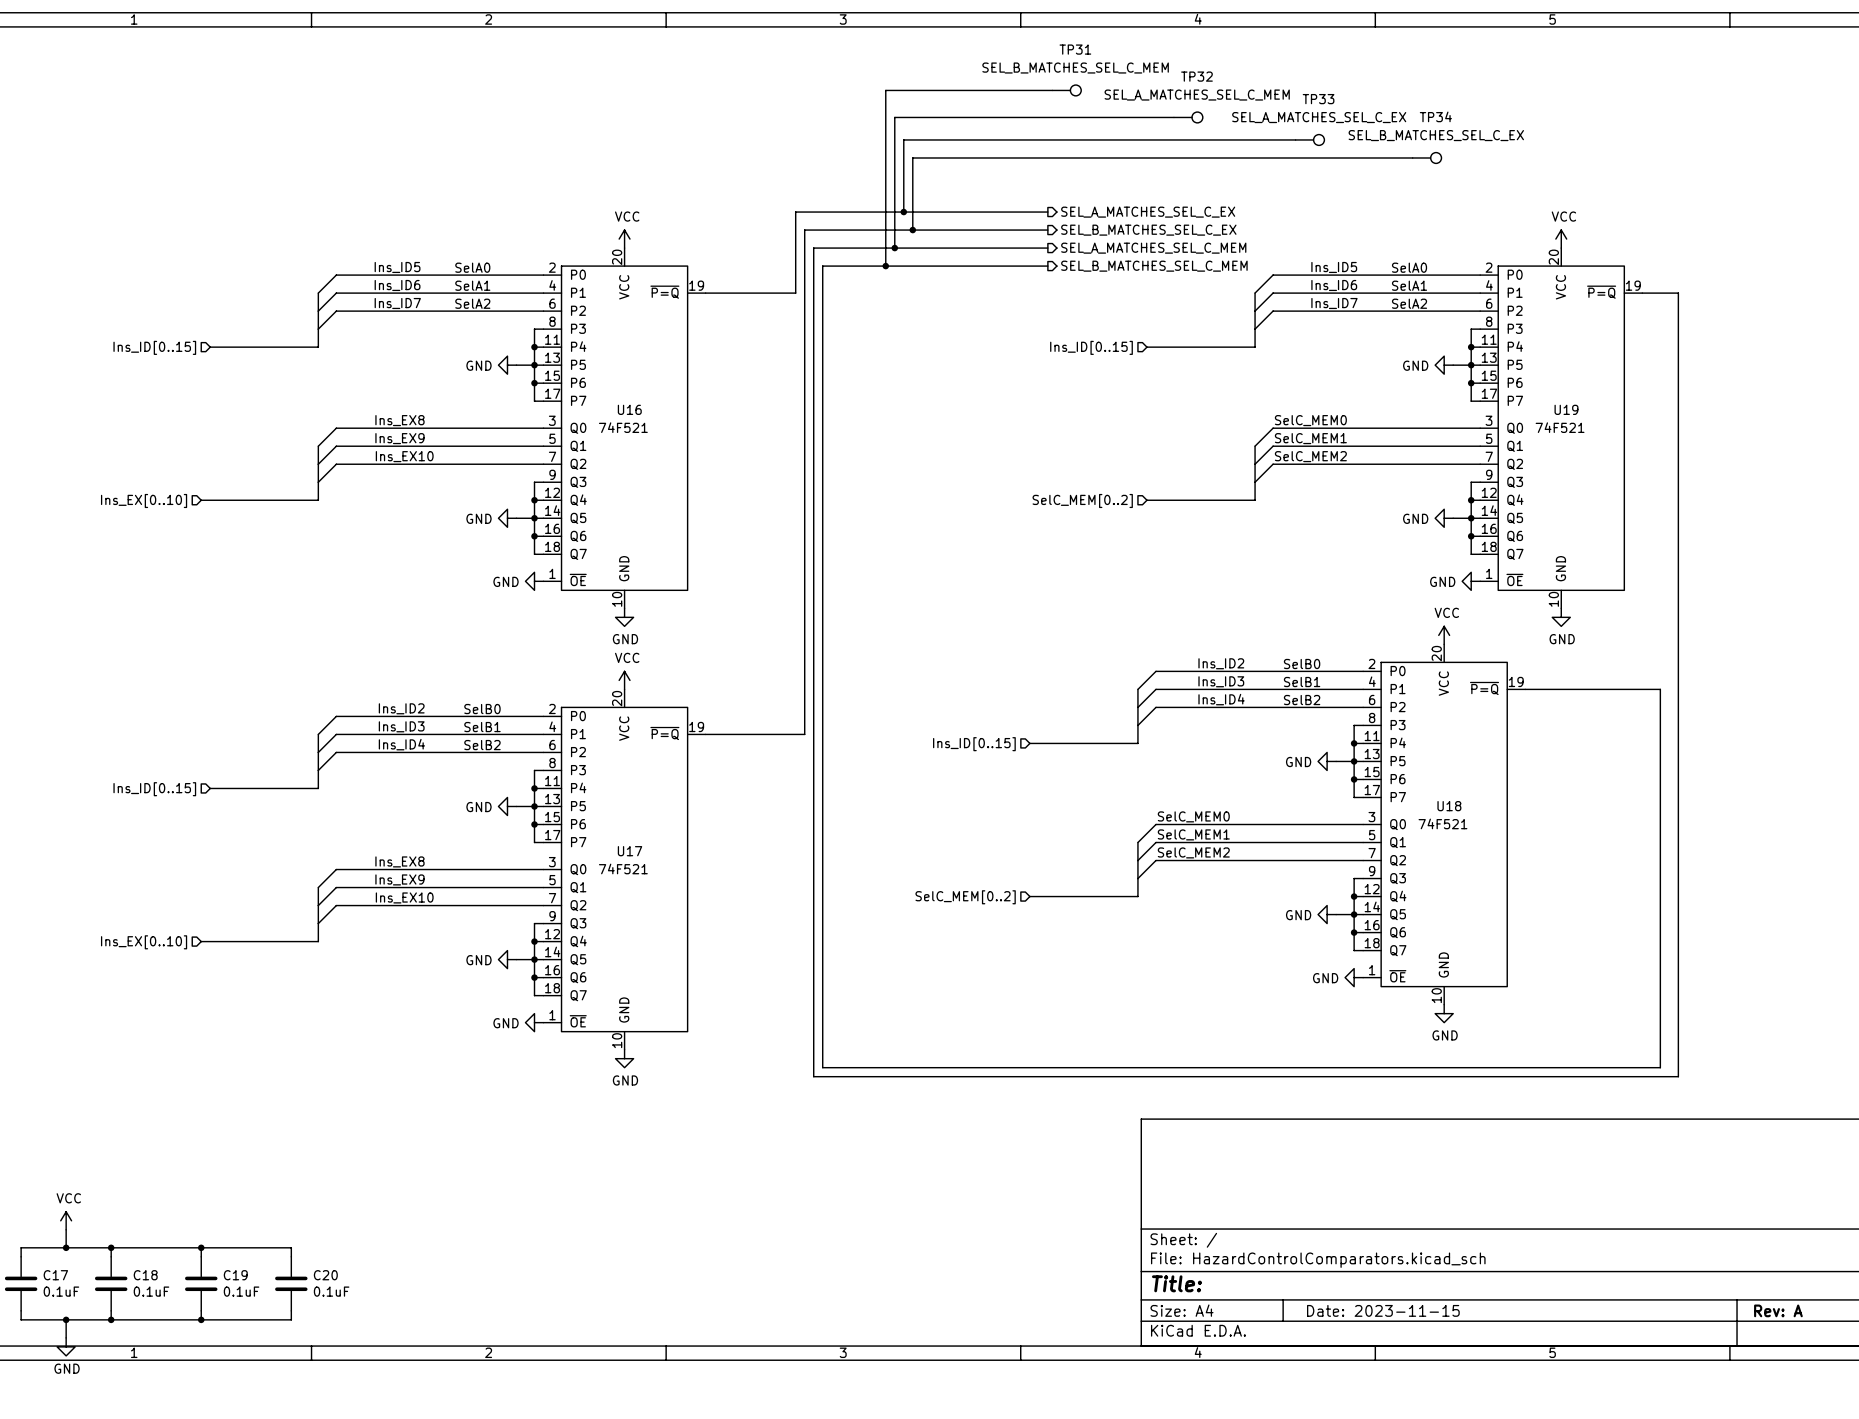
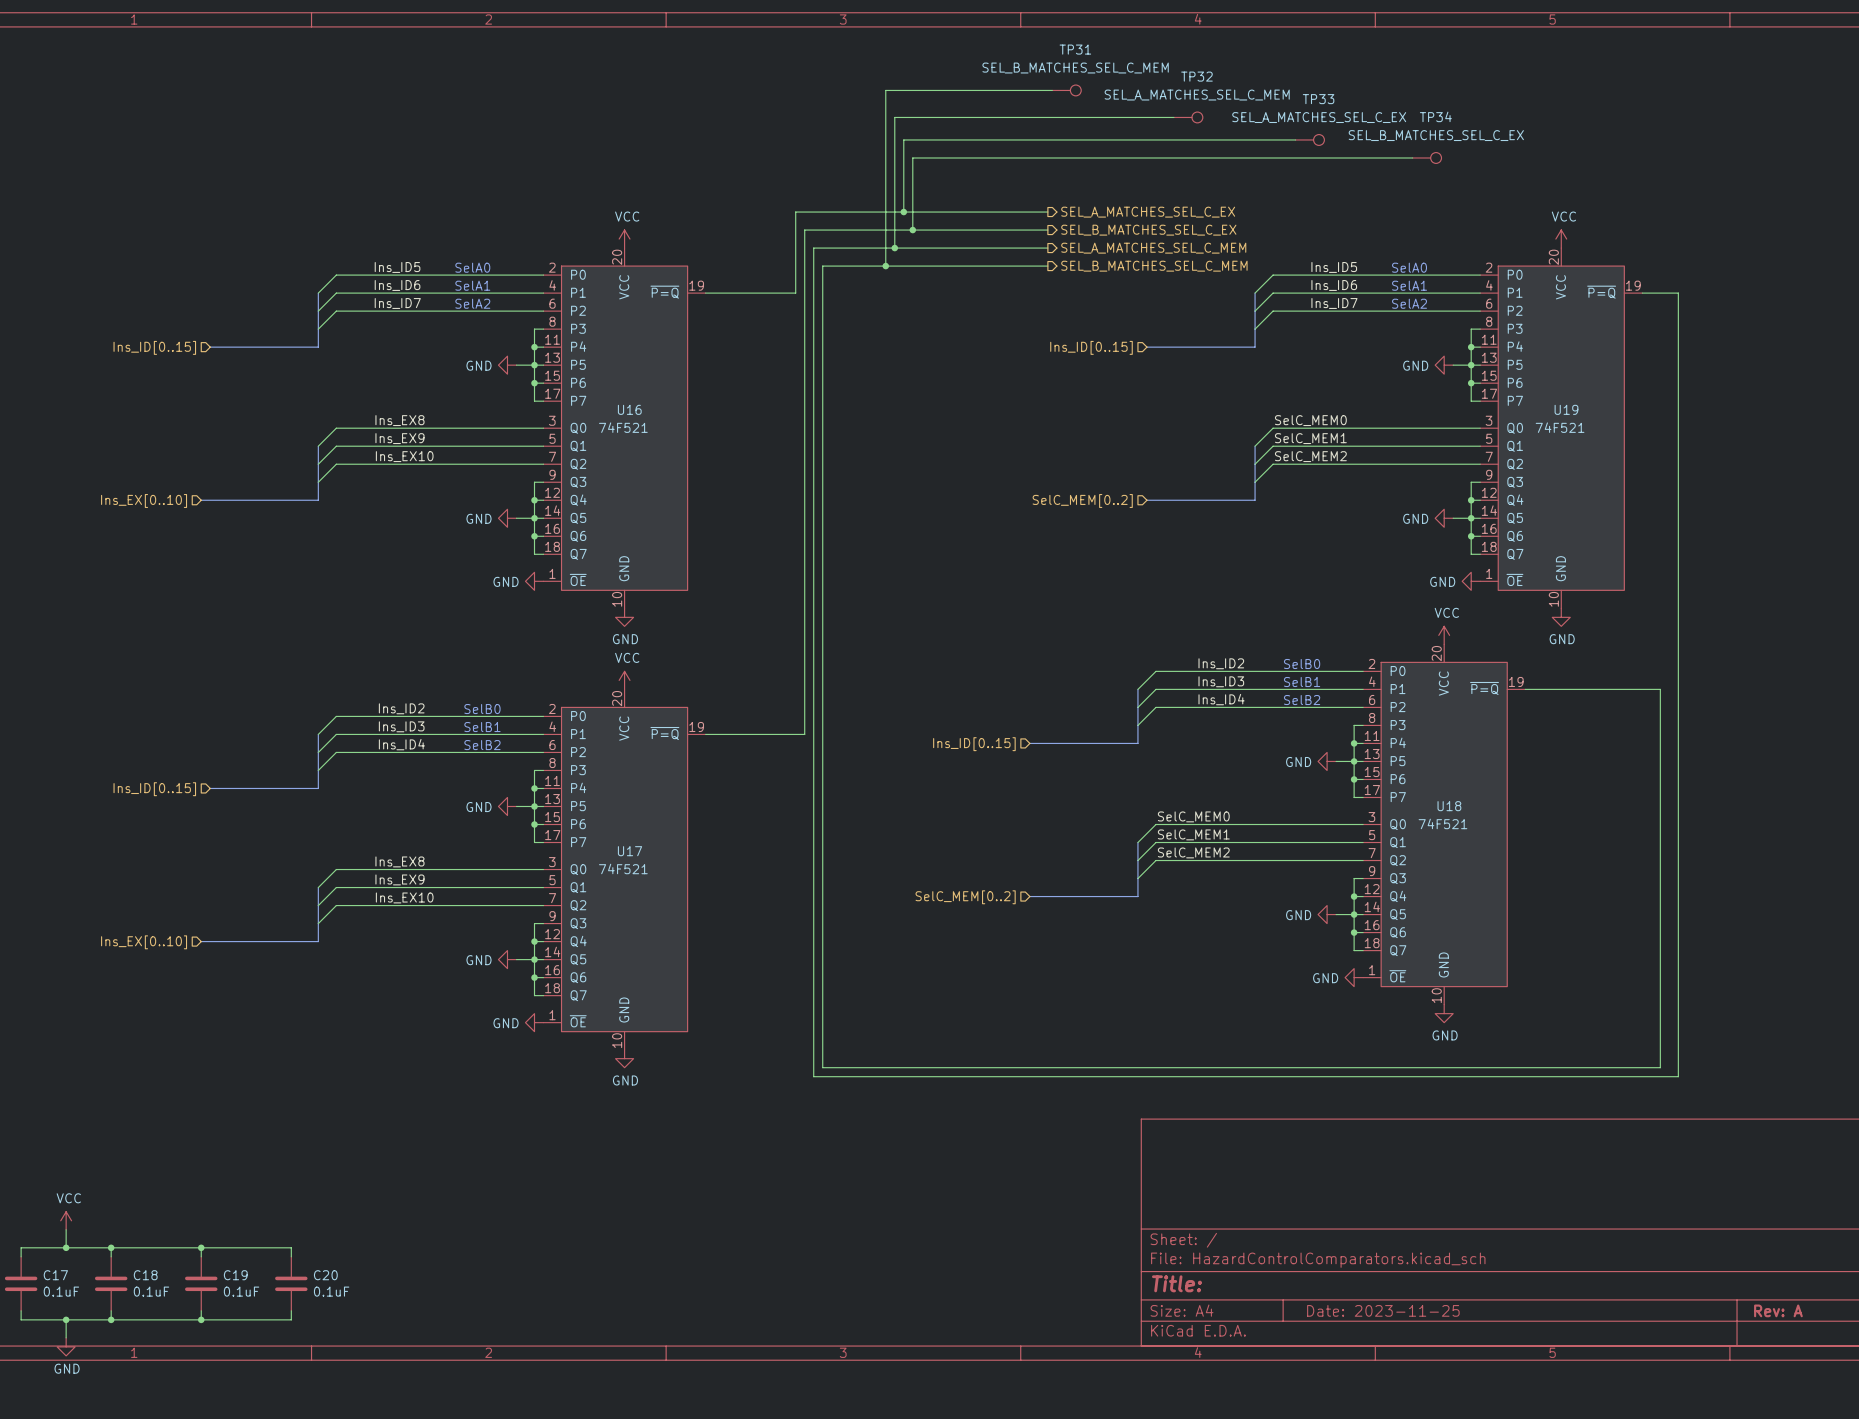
title block: Date: 2023-11-15 (1383, 1310) -> Date: 2023-11-25 (1383, 1310)

